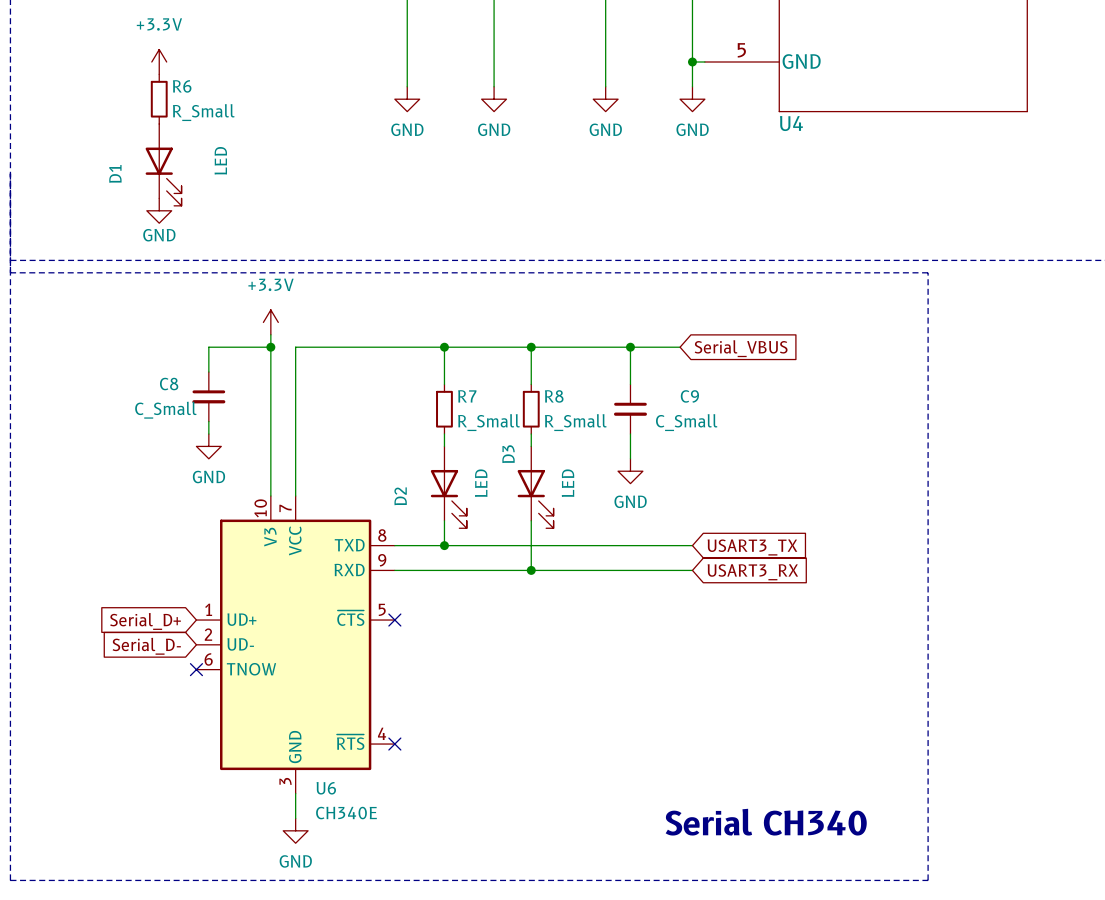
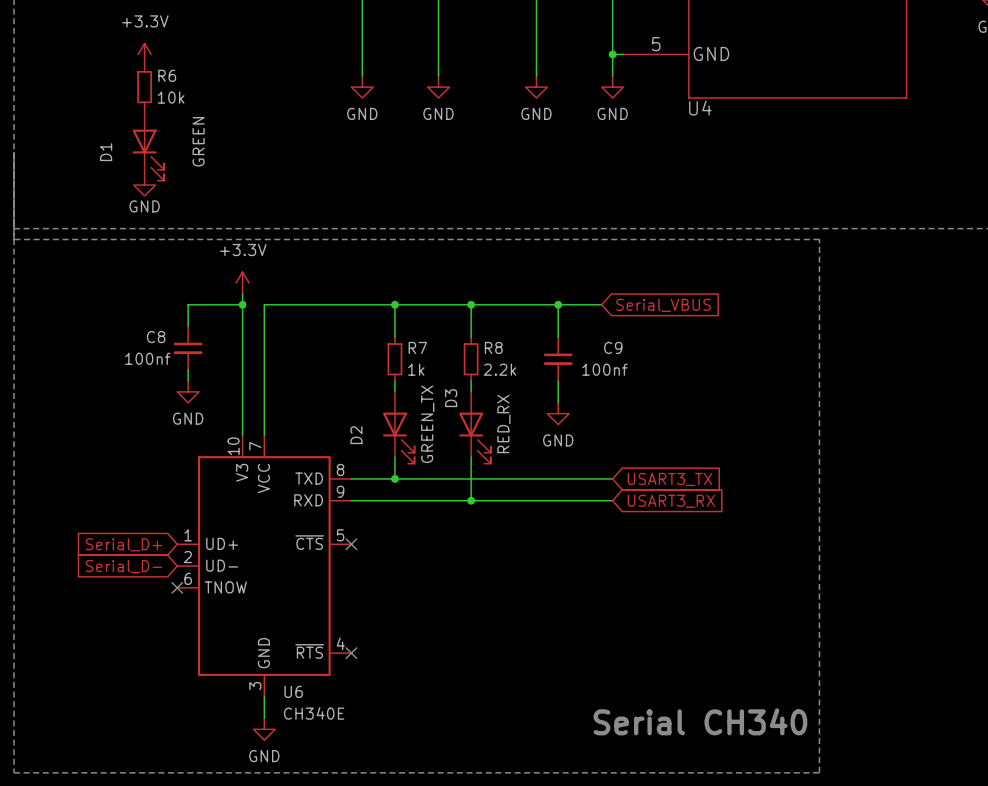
R6 value: R_Small (203, 112) -> 10k (171, 97)
D1 value: LED (220, 160) -> GREEN (198, 141)
C8 value: C_Small (165, 410) -> 100nf (147, 358)
R7 value: R_Small (488, 422) -> 1k (416, 369)
R8 value: R_Small (575, 422) -> 2.2k (500, 369)
C9 value: C_Small (686, 422) -> 100nf (604, 369)
D2 value: LED (481, 483) -> GREEN_TX (427, 424)
D3 value: LED (568, 483) -> RED_RX (503, 424)

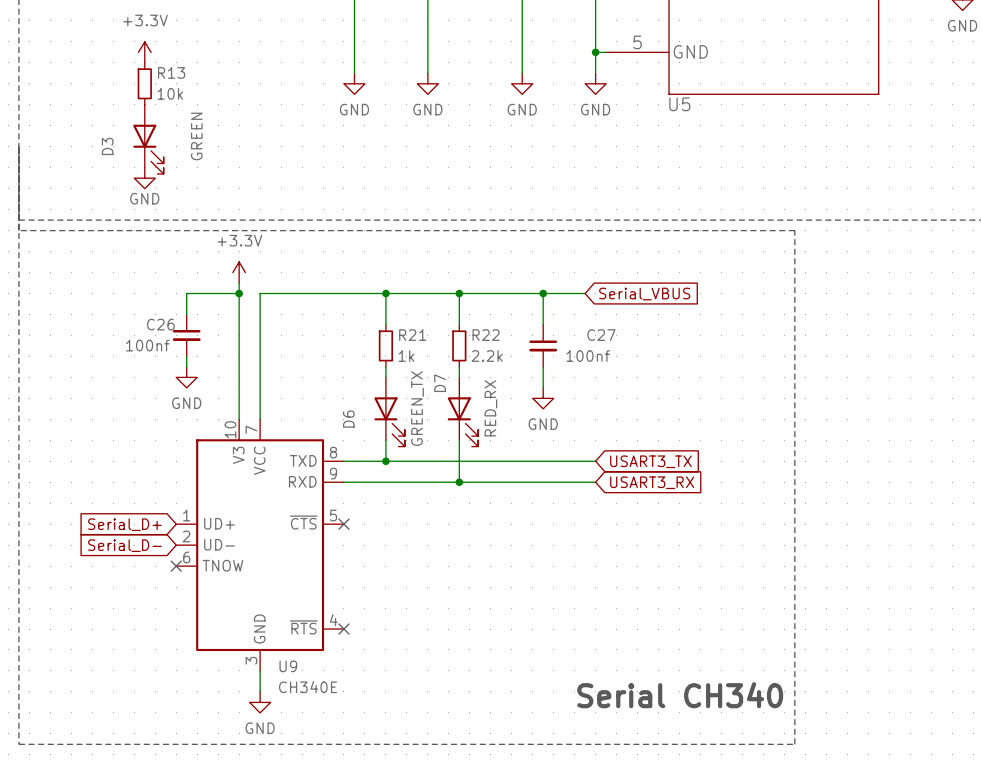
R6 name: R6 (167, 75) -> R13 (171, 72)
U4 name: U4 (700, 108) -> U5 (679, 104)
D1 name: D1 (106, 152) -> D3 (107, 146)
C8 name: C8 (156, 337) -> C26 (160, 324)
R7 name: R7 (417, 347) -> R21 (412, 335)
R8 name: R8 (493, 347) -> R22 (486, 335)
C9 name: C9 (613, 347) -> C27 (601, 335)
D3 name: D3 (451, 398) -> D7 (440, 383)
D2 name: D2 (356, 435) -> D6 (348, 419)
U6 name: U6 (293, 691) -> U9 (288, 666)

